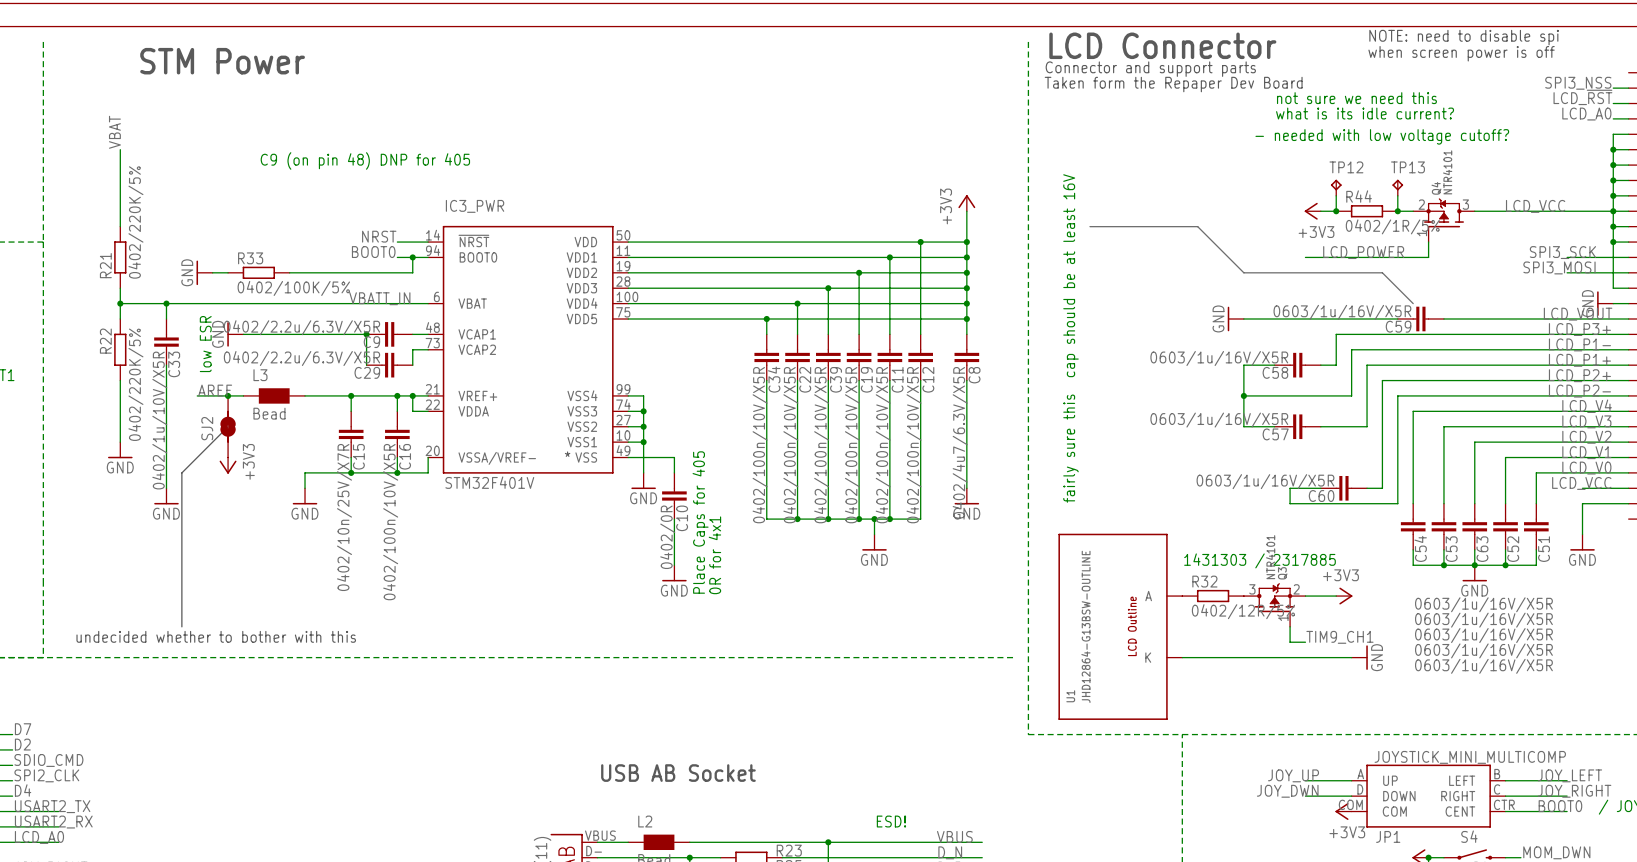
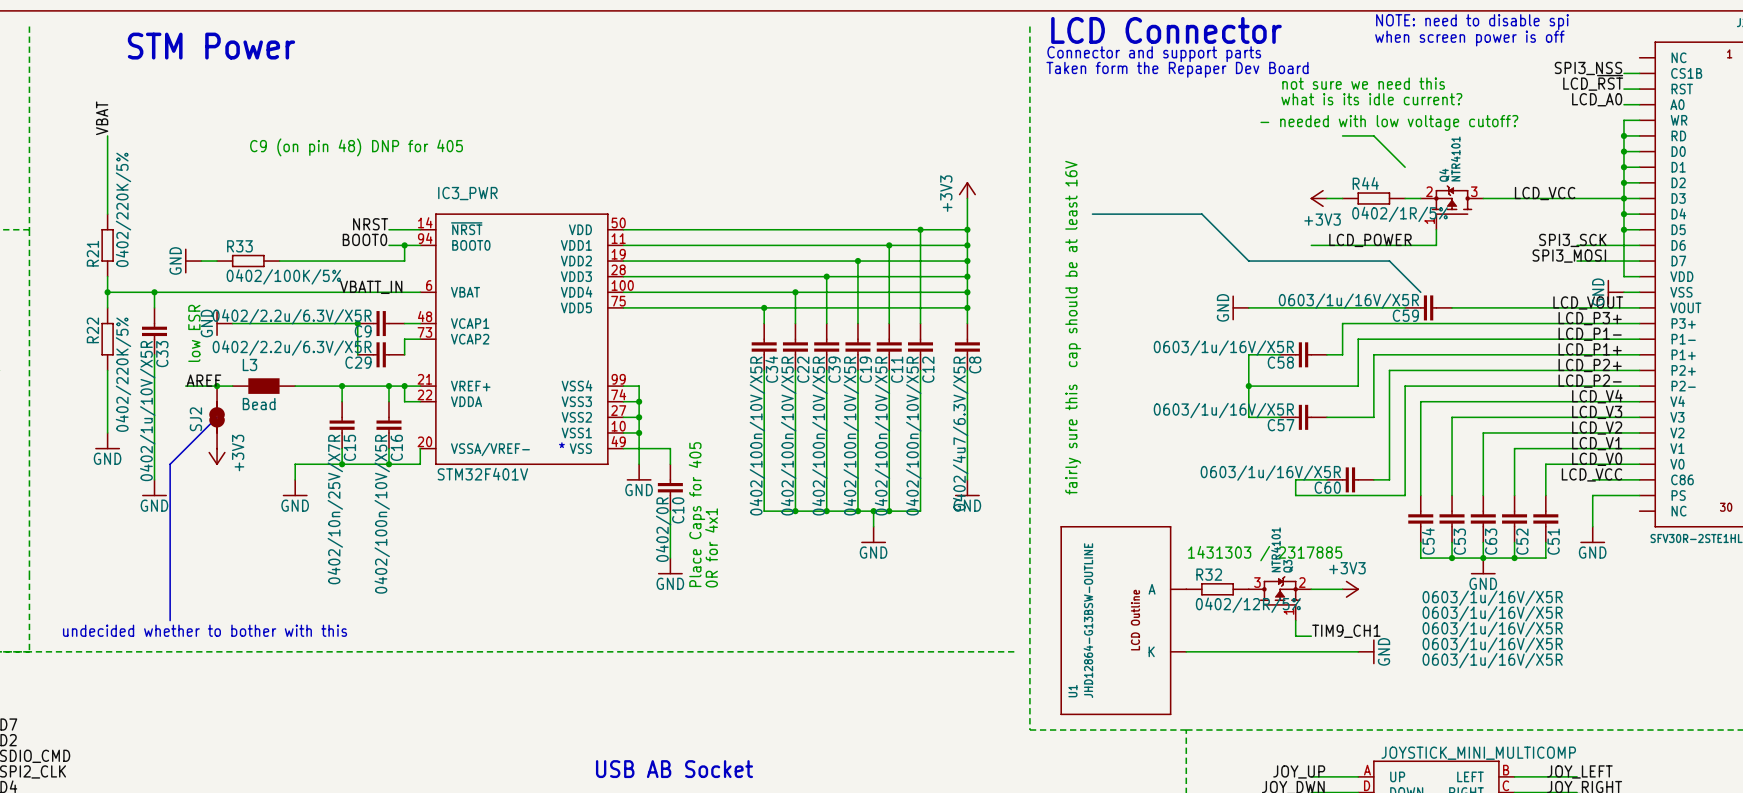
wire: none -> (1342, 135) (1373, 135) (1405, 167)
TP12: (1336, 187) -> none
TP13: (1397, 187) -> none
wire: (1336, 195) (1336, 211) -> none
wire: (1397, 195) (1397, 211) -> none
junction: (1336, 211) -> none
junction: (1397, 211) -> none

